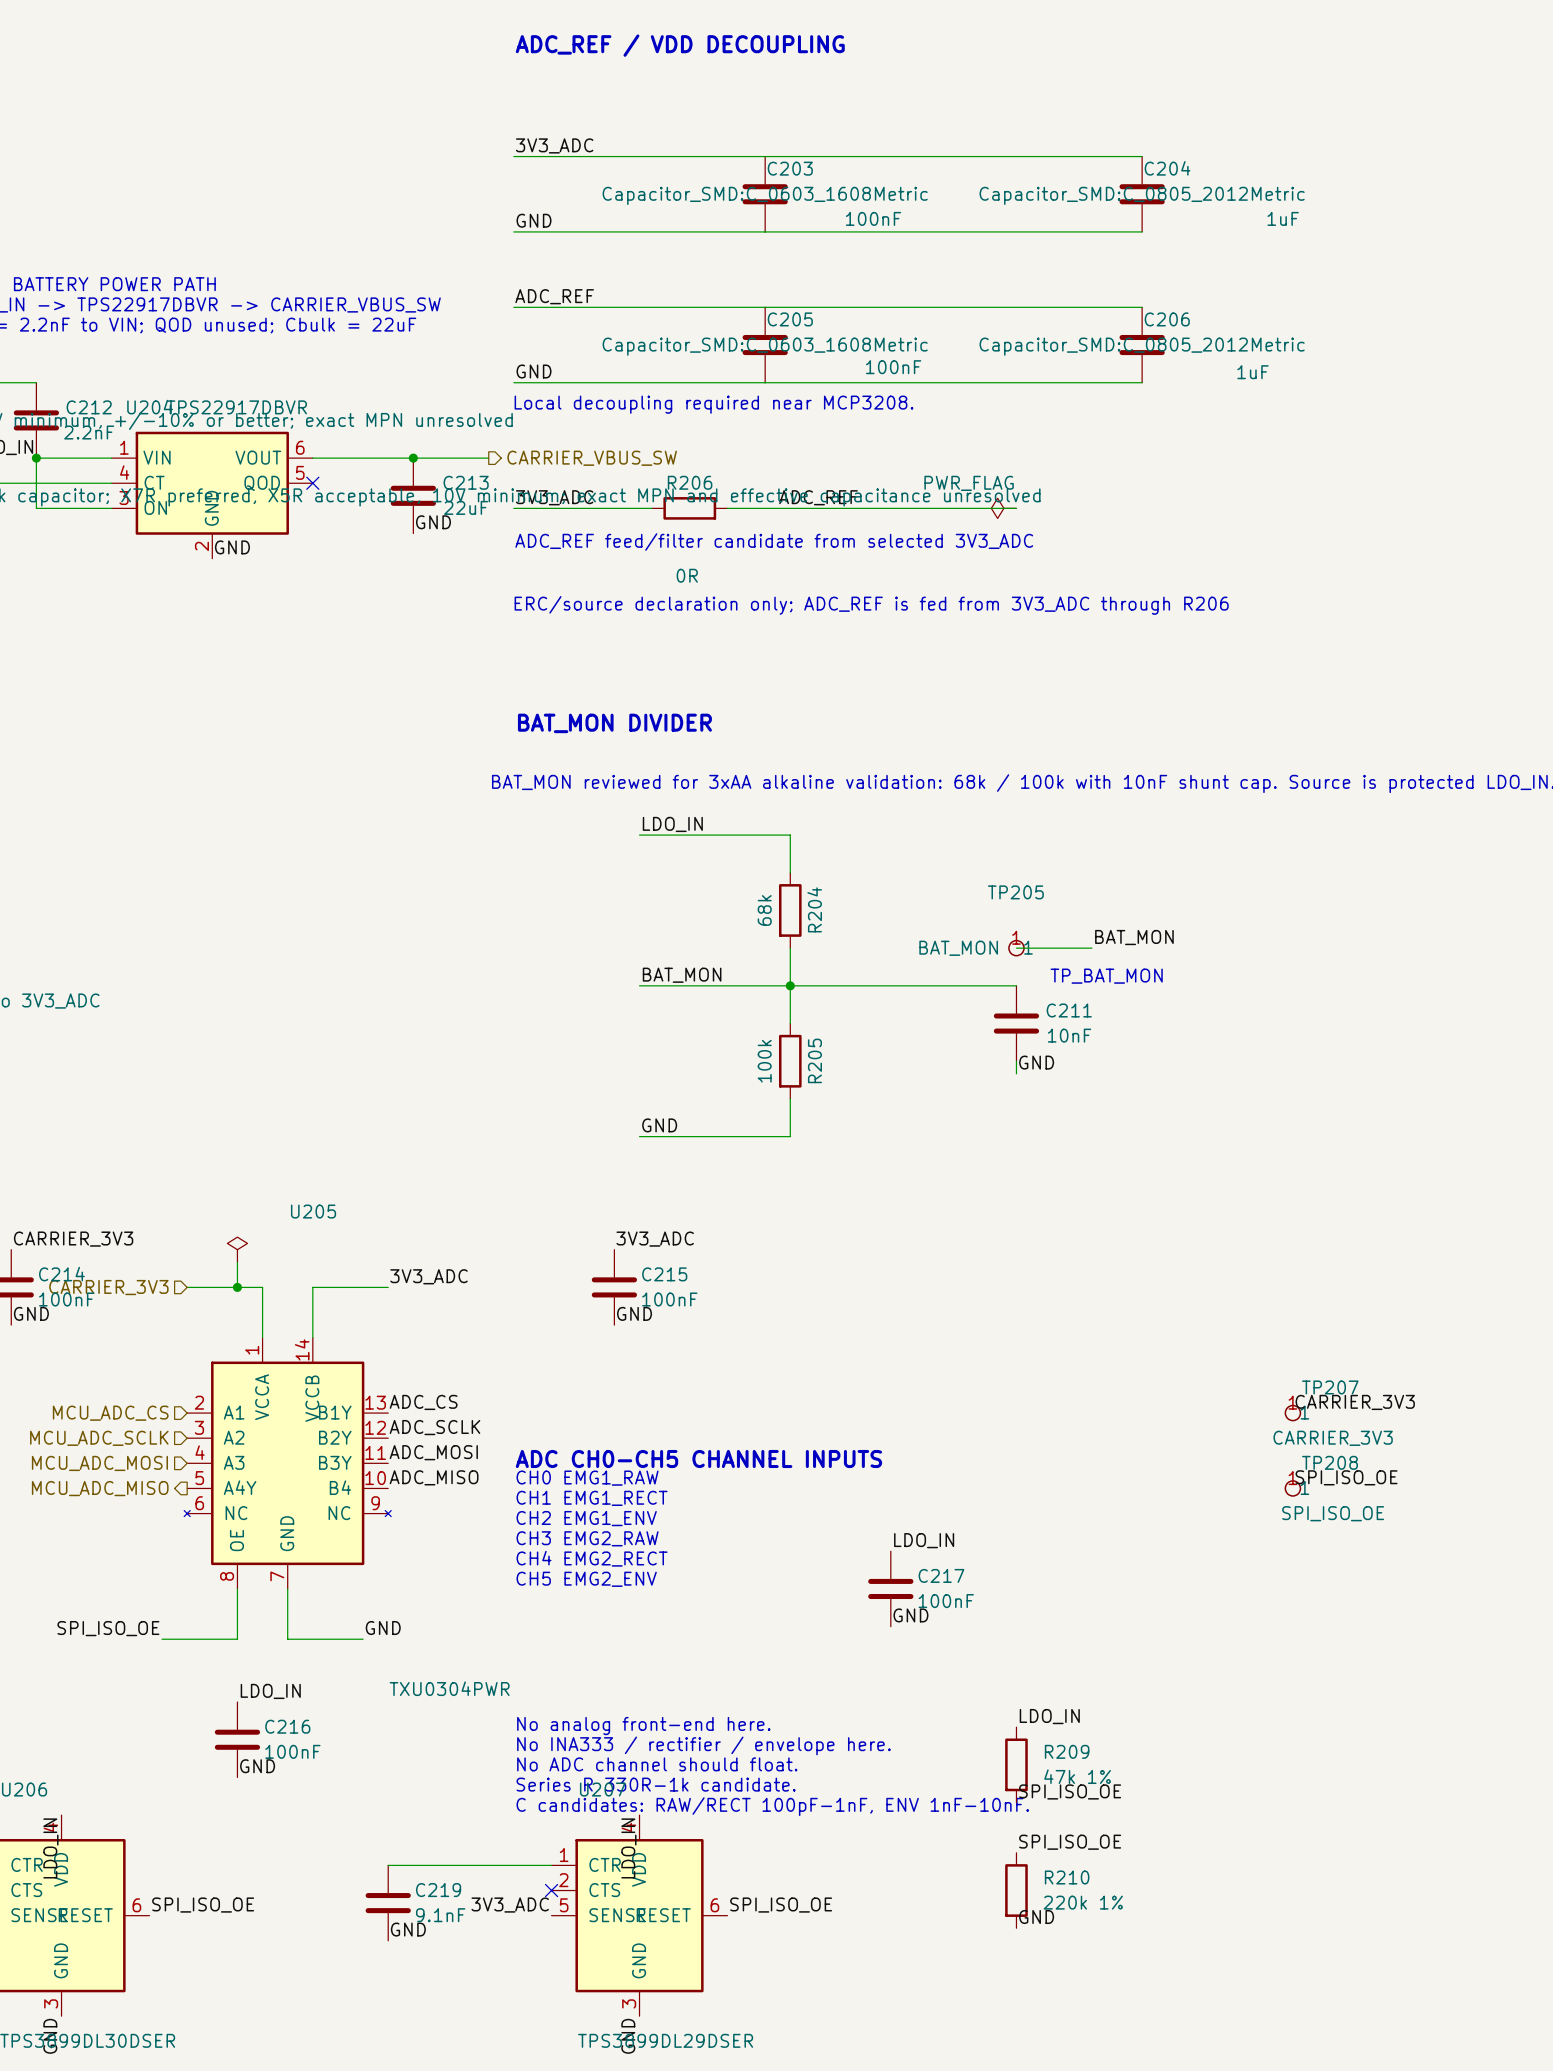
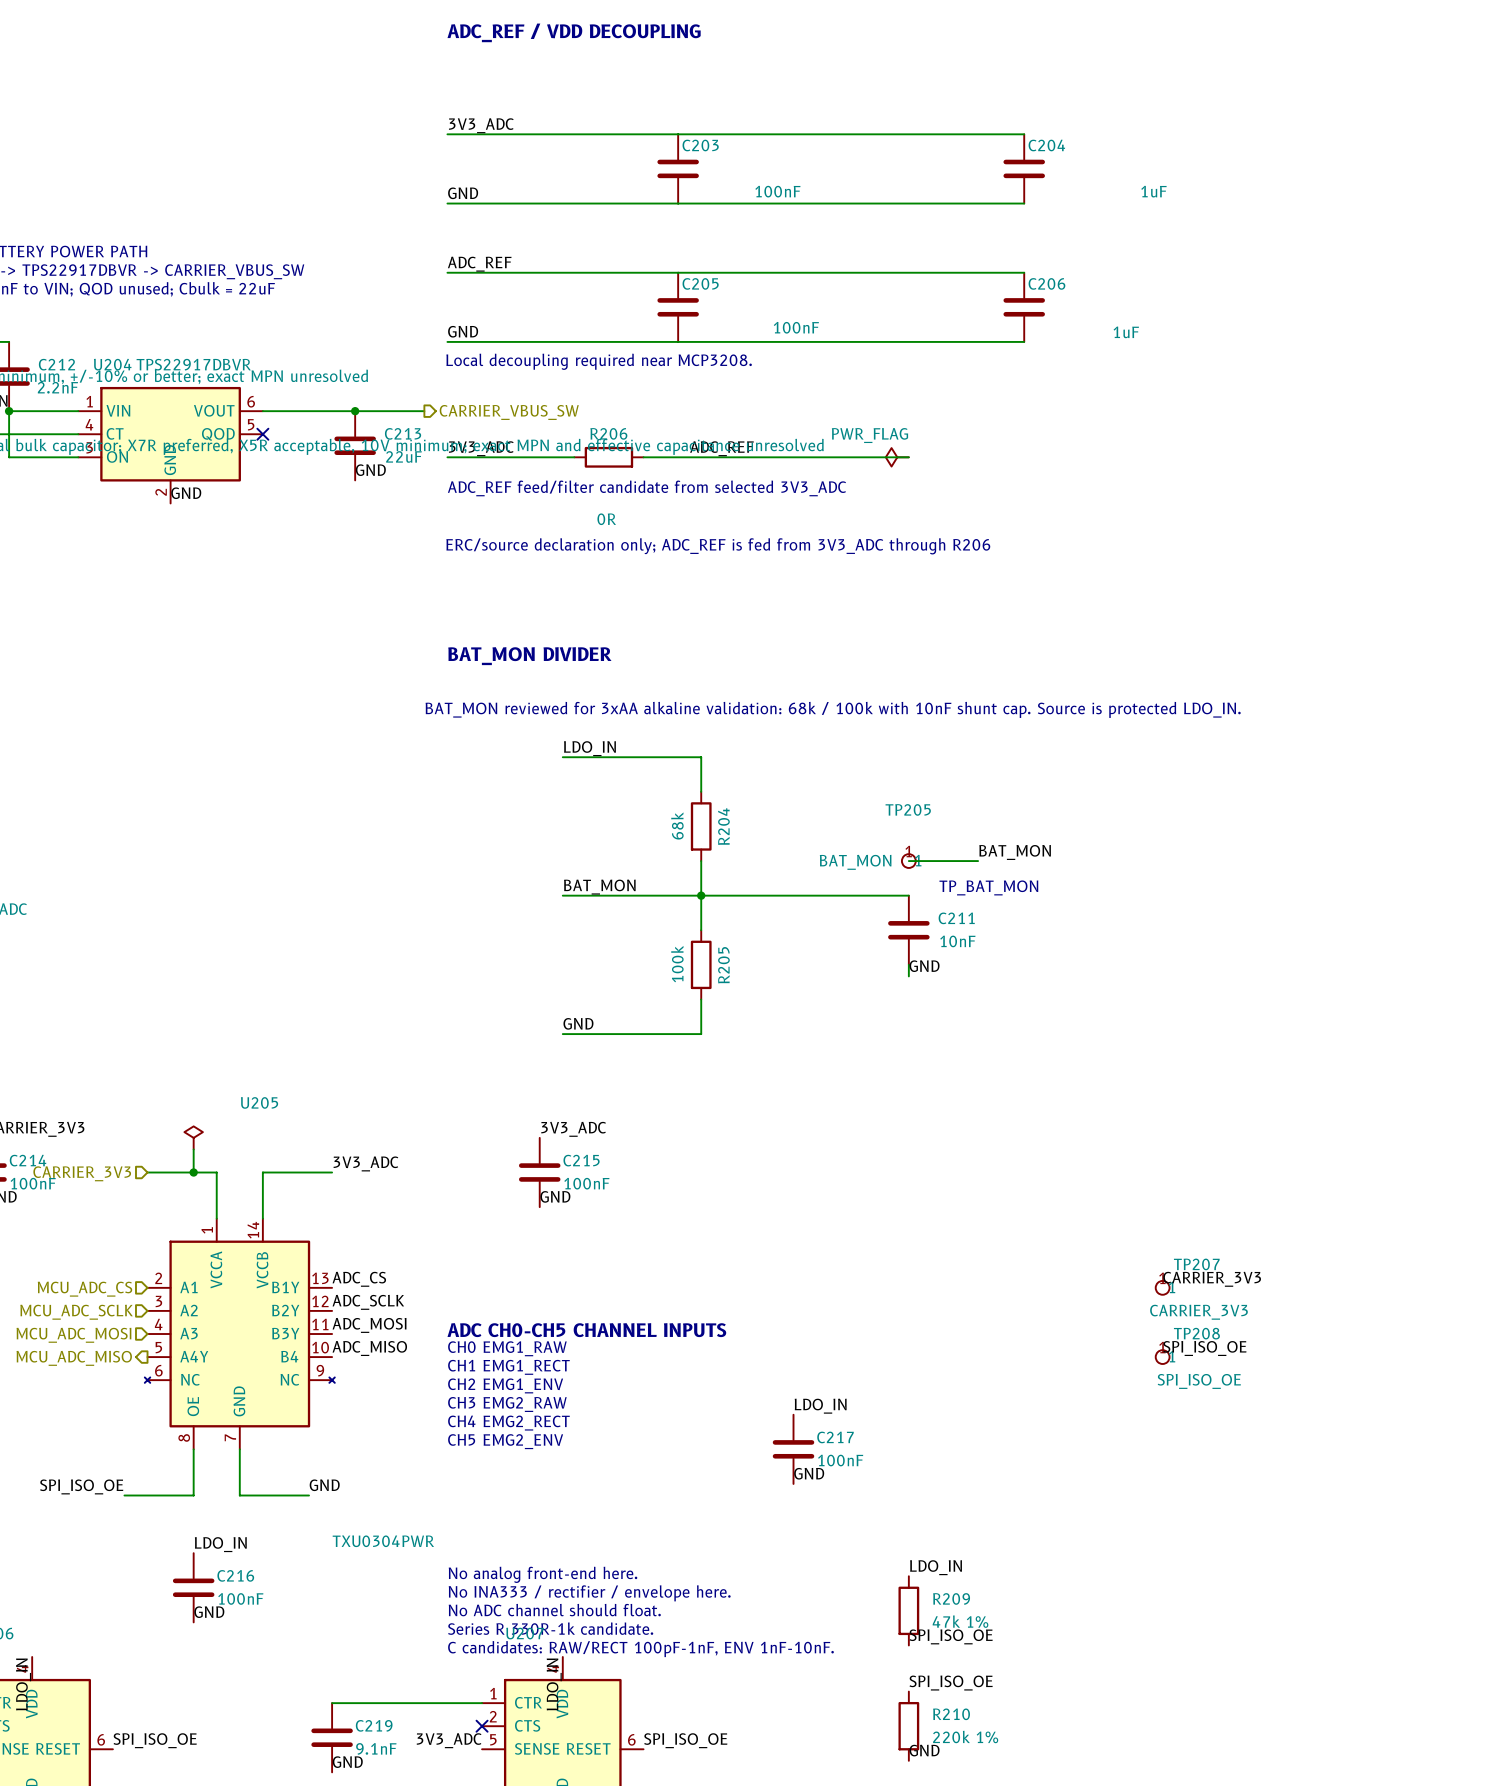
C203 text: Capacitor_SMD:C_0603_1608Metric (765, 195) -> none
C204 text: Capacitor_SMD:C_0805_2012Metric (1142, 195) -> none
C205 text: Capacitor_SMD:C_0603_1608Metric (765, 346) -> none
C206 text: Capacitor_SMD:C_0805_2012Metric (1142, 346) -> none

